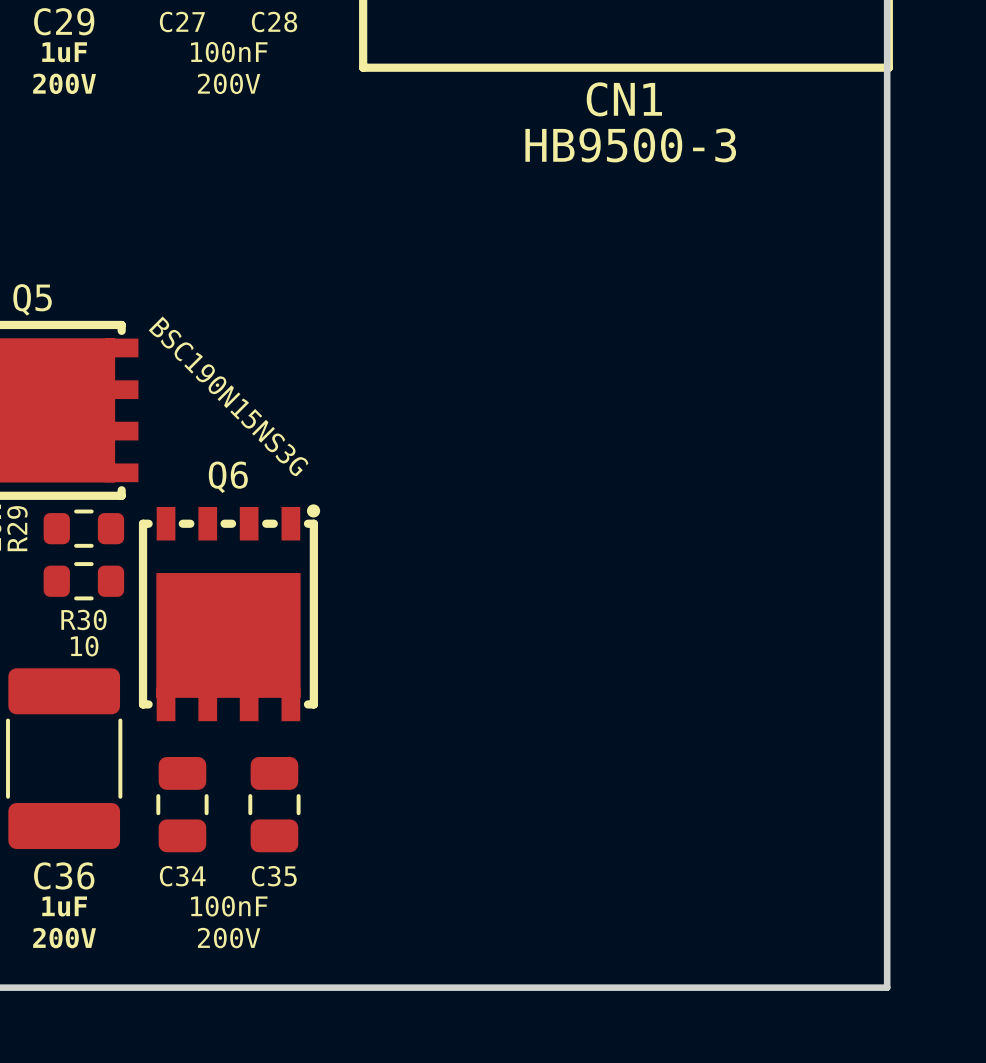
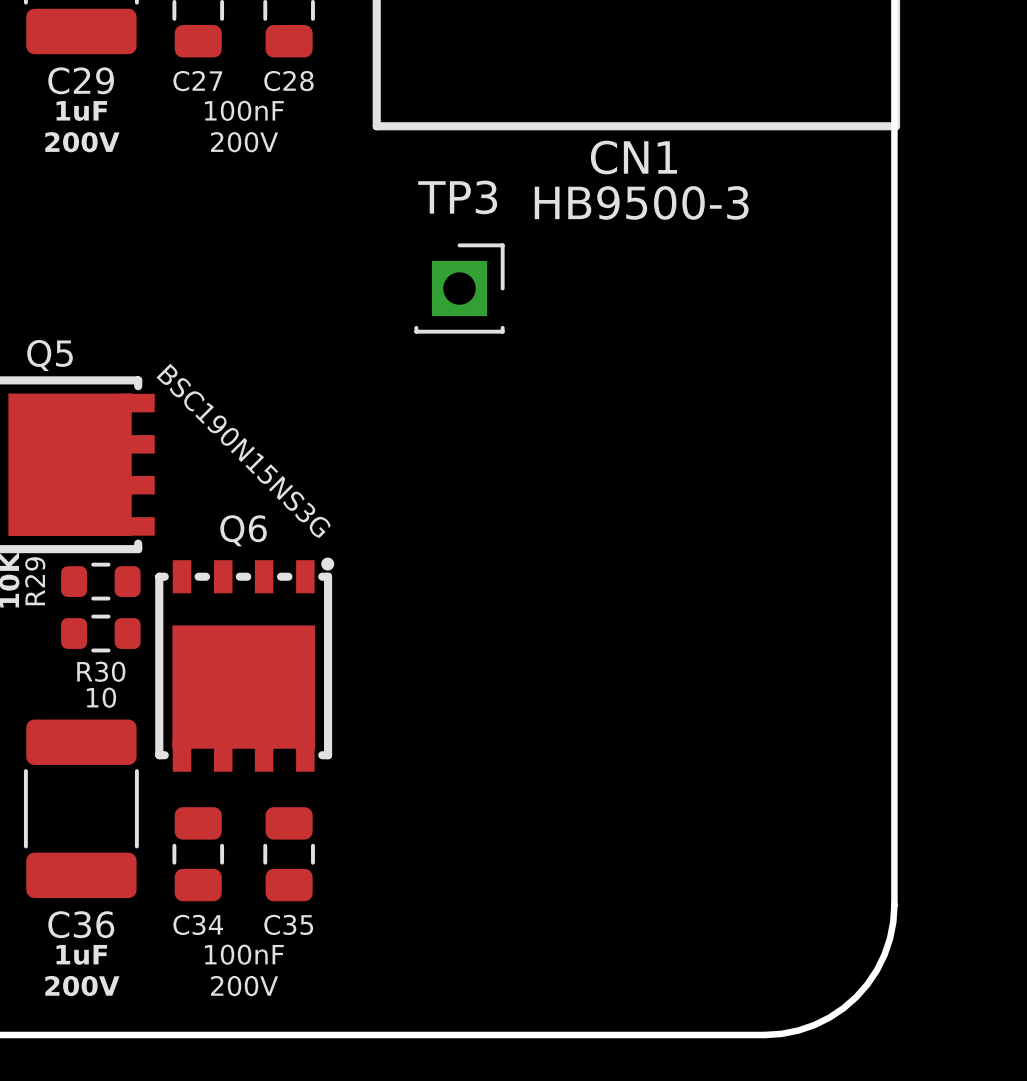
TP3: none -> (459, 288)
board edge: (887, 856) (887, 987) (755, 987) -> (894, 905) (889, 938) (884, 954) (867, 984) (856, 996) (829, 1017) (814, 1025) (781, 1033) (764, 1035)

